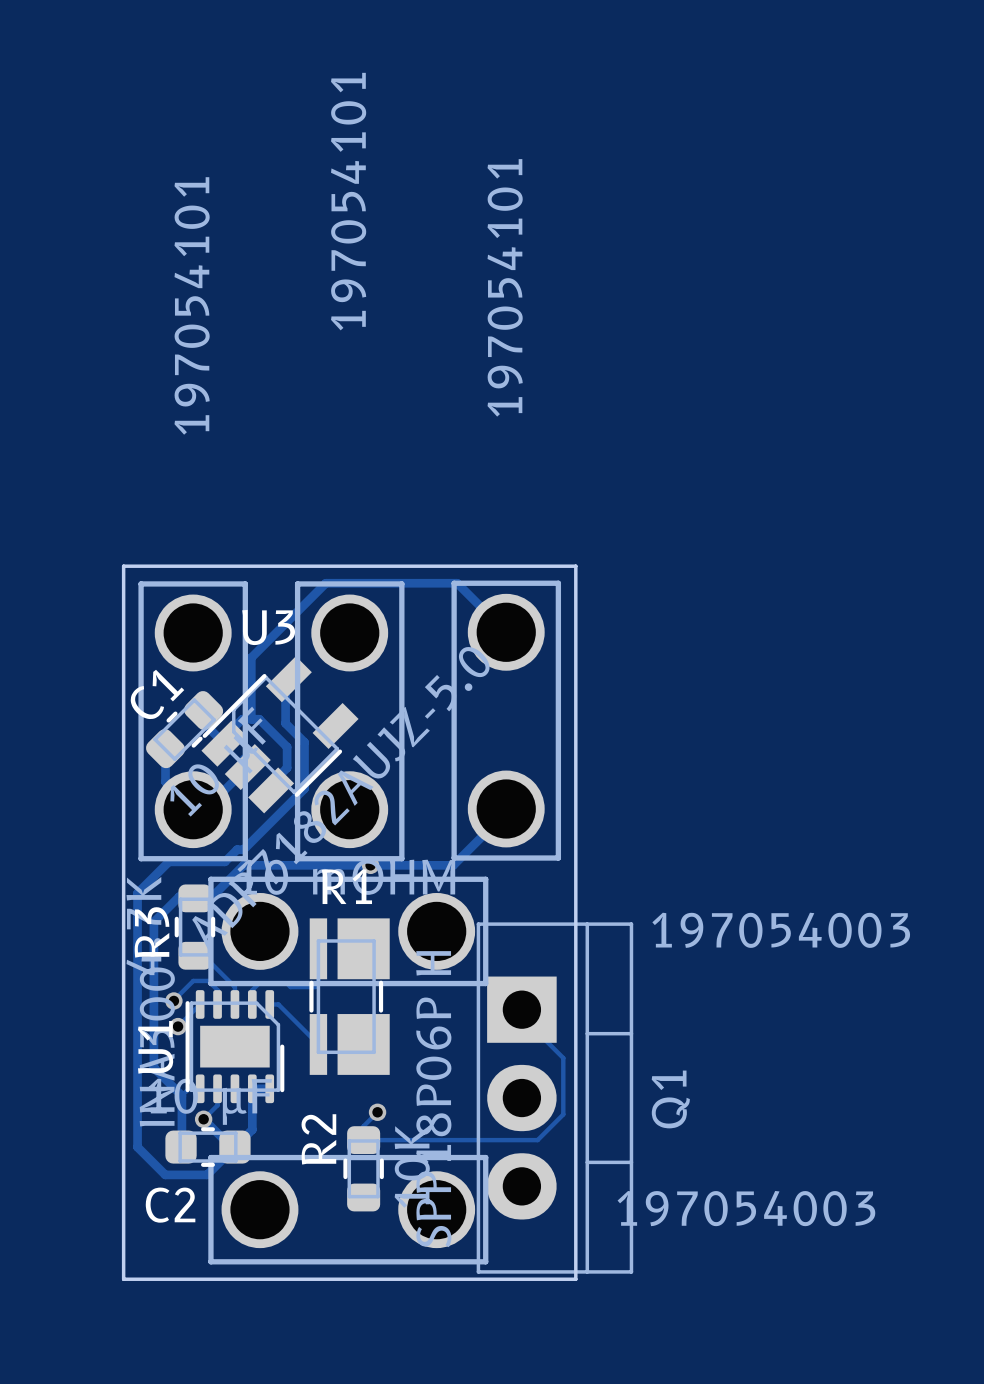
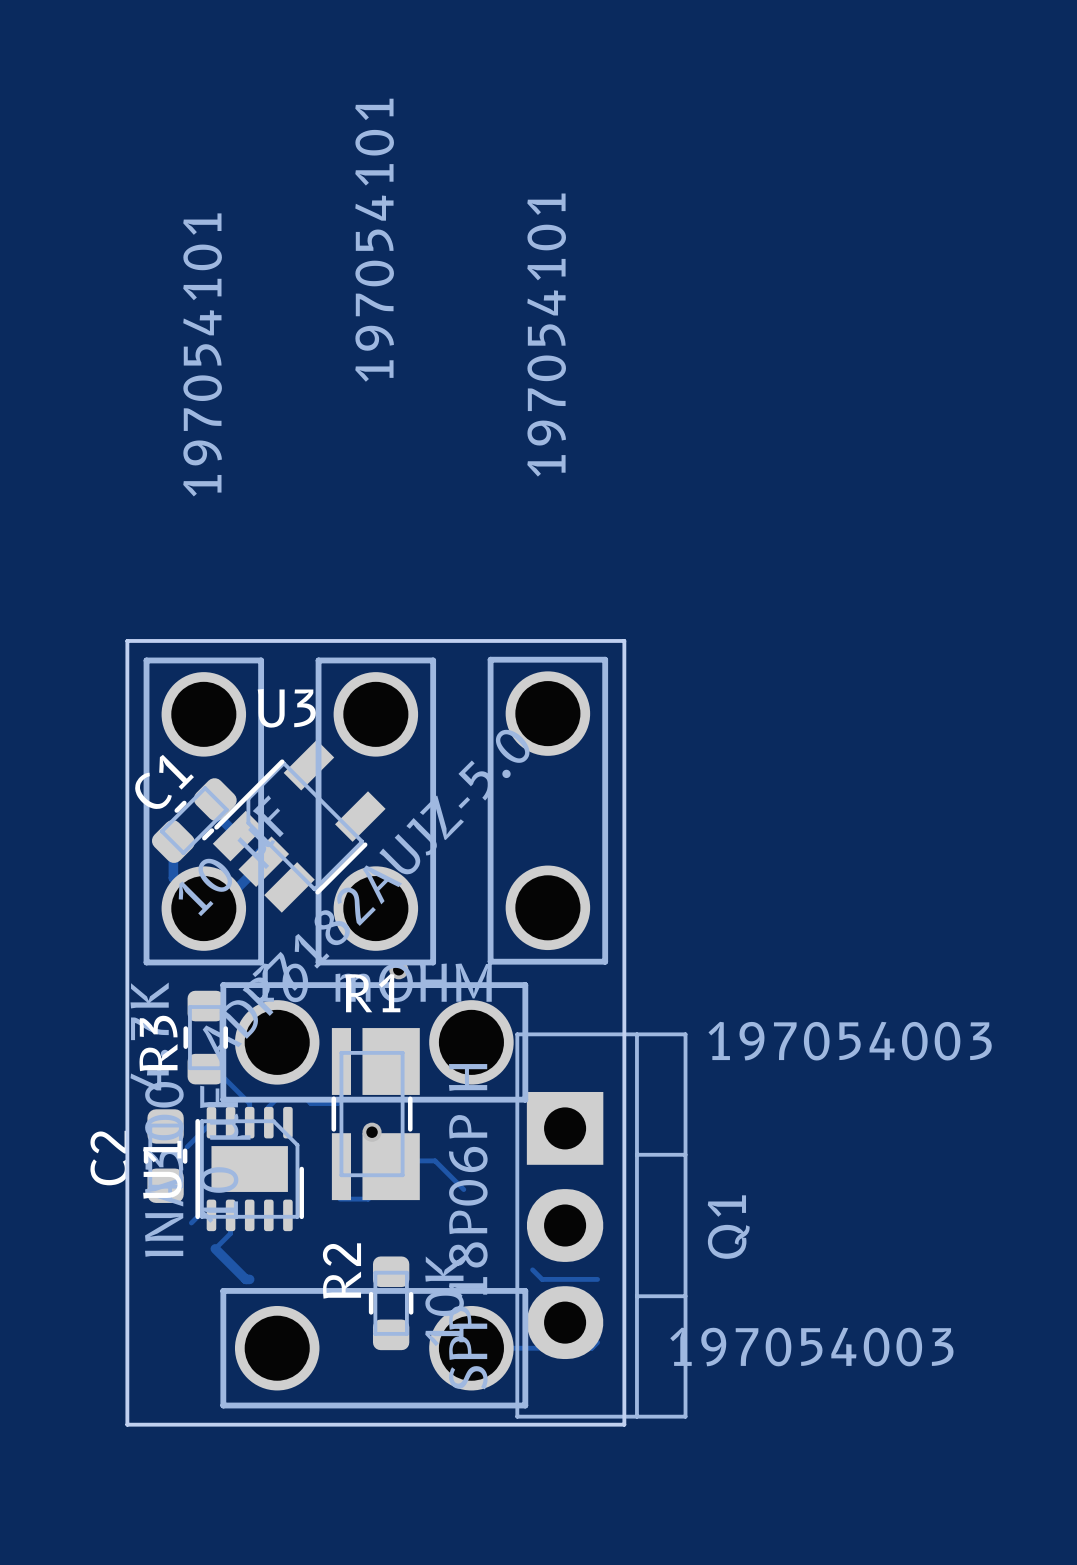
track: (506, 632) (457, 583) (325, 583) (251, 657) (252, 719) -> none
track: (285, 675) (285, 723) (304, 742) (304, 788) (243, 849) (237, 849) (224, 861) (168, 861) (137, 893) (137, 1147) (165, 1174) (207, 1174) (252, 1129) (252, 1088) (269, 1088) -> none
track: (221, 740) (242, 719) (259, 719) (287, 747) (287, 767) (267, 787) -> none
track: (506, 812) (453, 865) (243, 865) (212, 896) (179, 896) (153, 922) (153, 1067) (181, 1095) (181, 1147) -> none
track: (173, 1000) (193, 980) (208, 980) (217, 990) (217, 1004) -> none
via: (173, 1000) -> none
track: (269, 1004) (278, 1004) (318, 1044) -> none
track: (521, 1009) (521, 1016) (563, 1058) (563, 1114) (537, 1140) (363, 1140) (363, 1126) (377, 1112) -> none
via: none -> (372, 1132)
via: (178, 1026) -> none
track: none -> (463, 1189) (435, 1160) (406, 1160) (368, 1199) (340, 1199)
via: (377, 1112) -> none
via: (203, 1119) -> none
track: none -> (532, 1269) (542, 1279) (597, 1279)
C2 rotation: 0° (207, 1147) -> 90° clockwise (165, 1156)
C2 position: (207, 1147) -> (165, 1156)
track: none -> (597, 1342) (591, 1348) (471, 1348)

